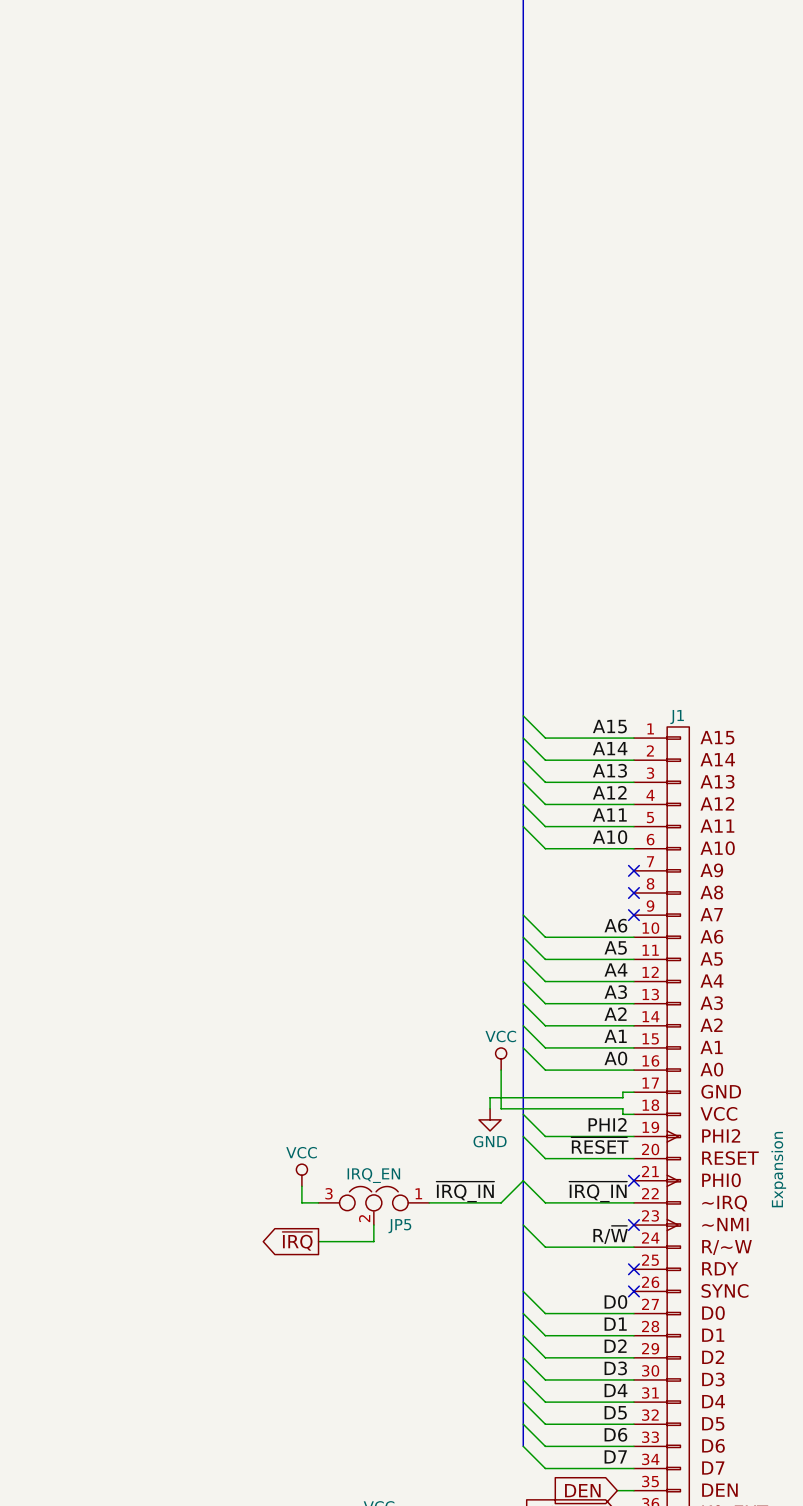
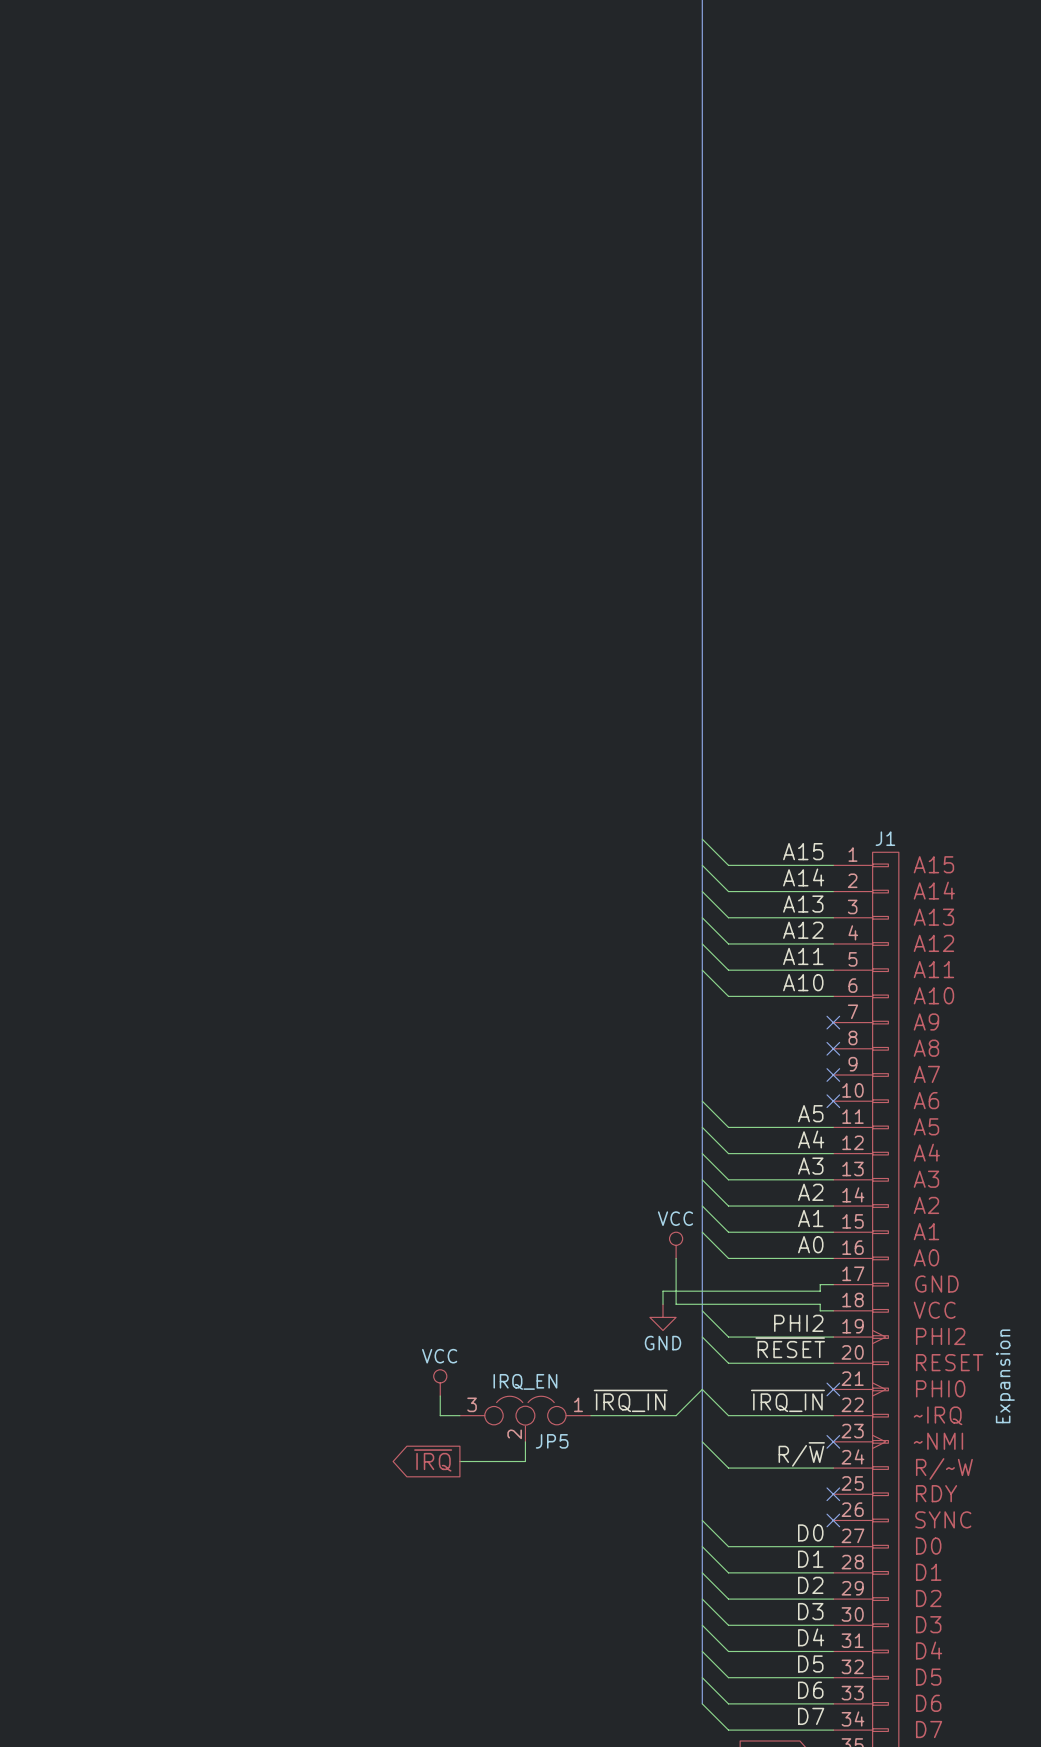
wire: (523, 915) (545, 937) (633, 937) -> none
label: A6 (615, 925) -> none
no-connect mark: none -> (833, 1101)

